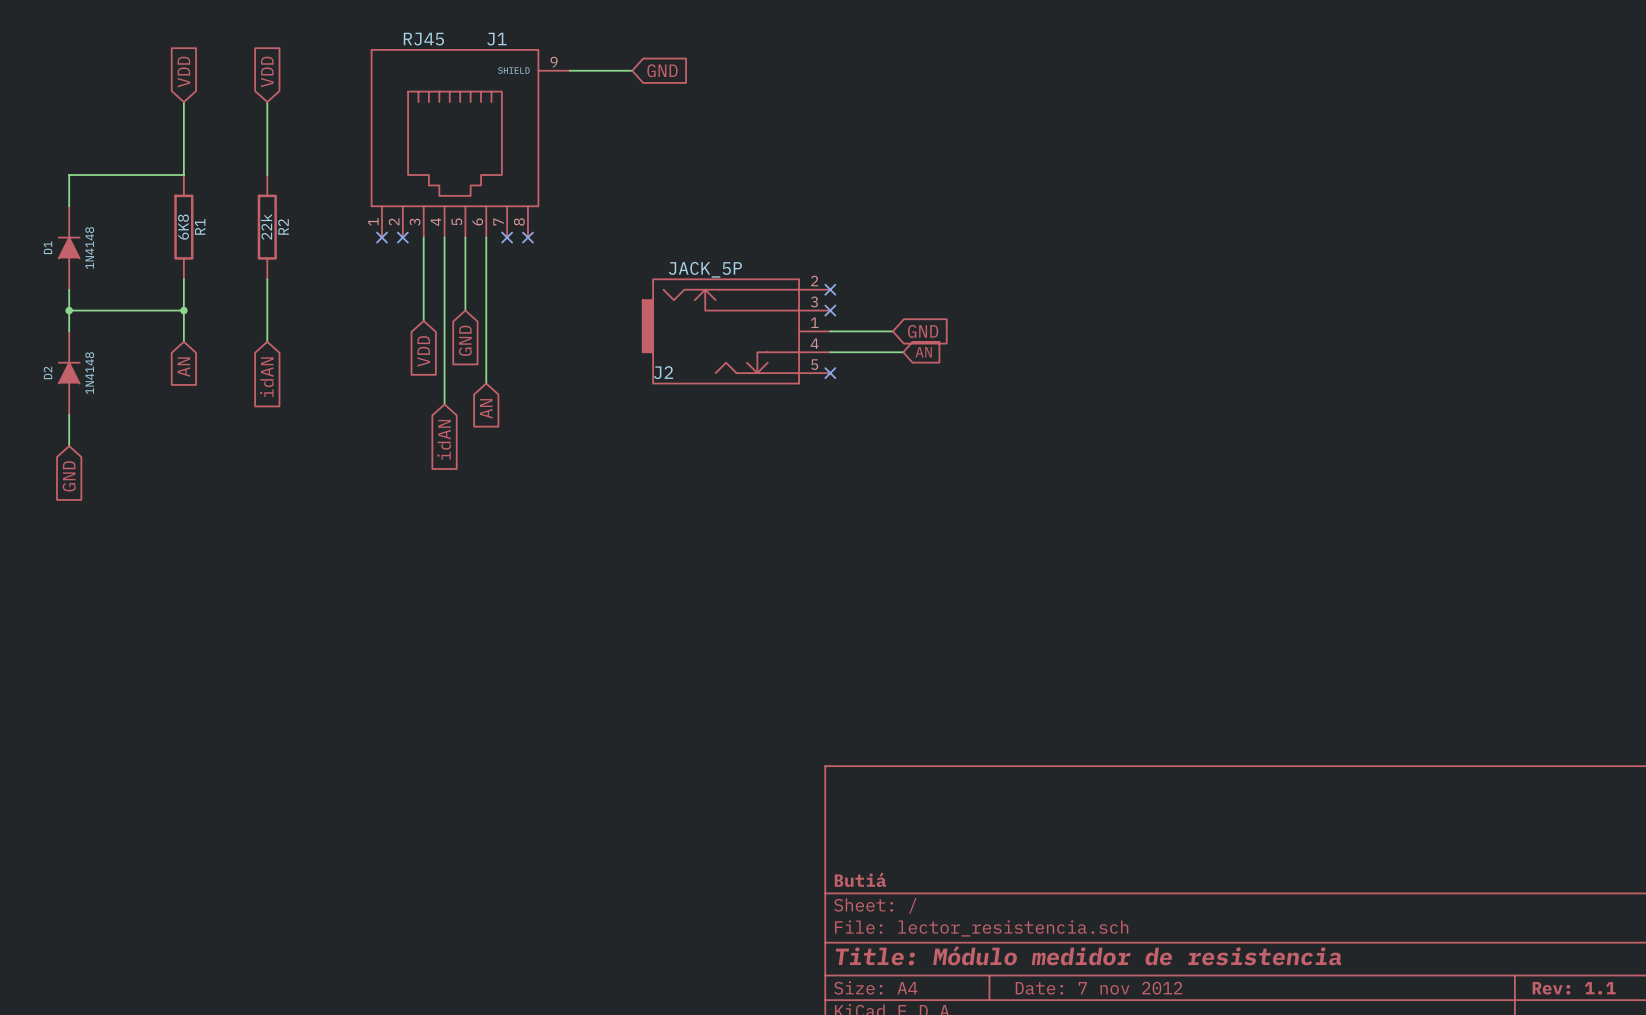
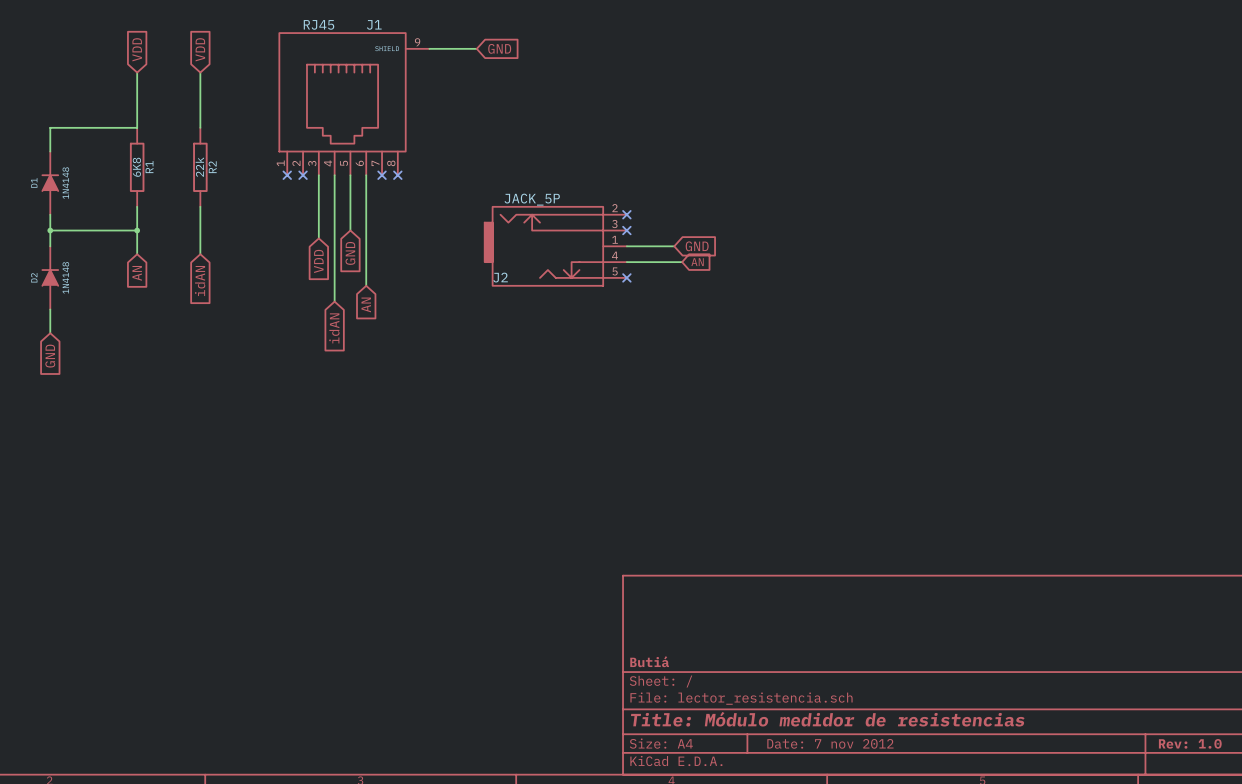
title block: Title: Módulo medidor de resistencia (1088, 955) -> Title: Módulo medidor de resistencias (827, 719)
title block: Rev: 1.1 (1574, 988) -> Rev: 1.0 (1190, 743)

